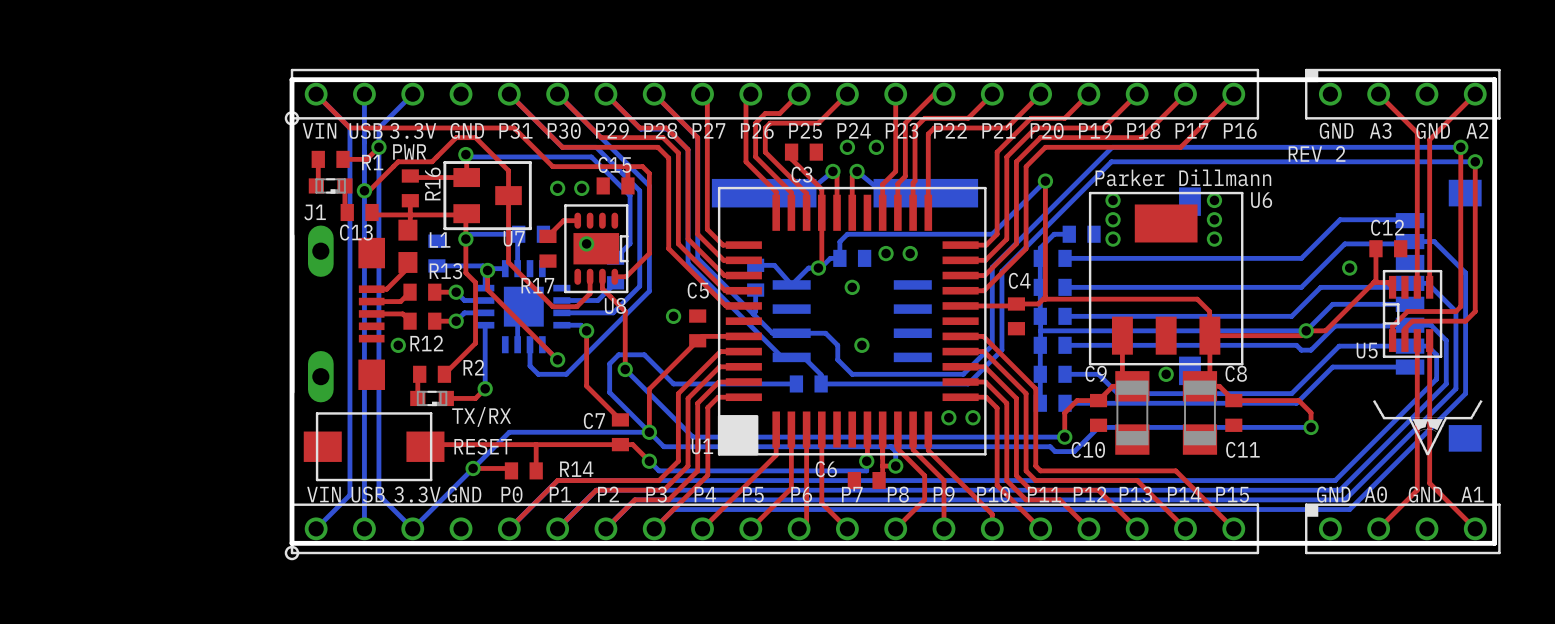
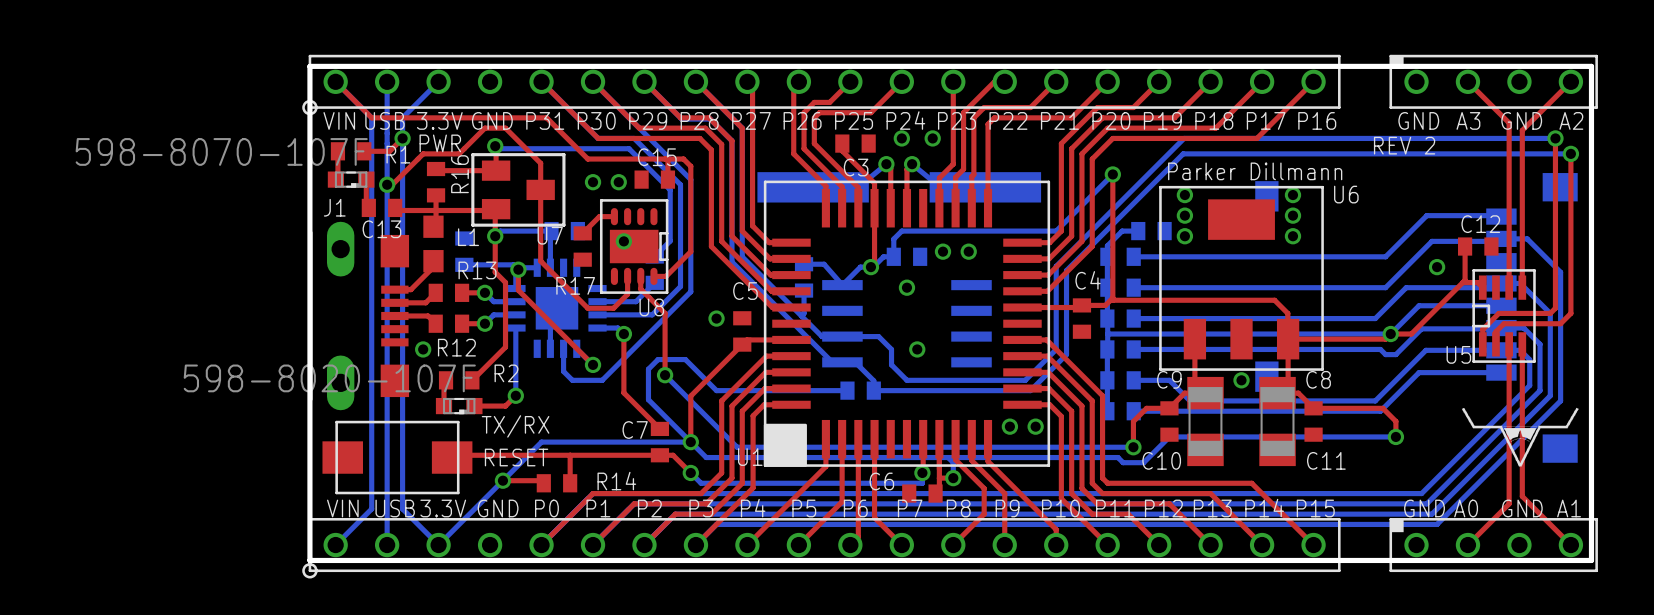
PWR value: none -> 598-8070-107F (221, 151)
TX/RX value: none -> 598-8020-107F (329, 378)

